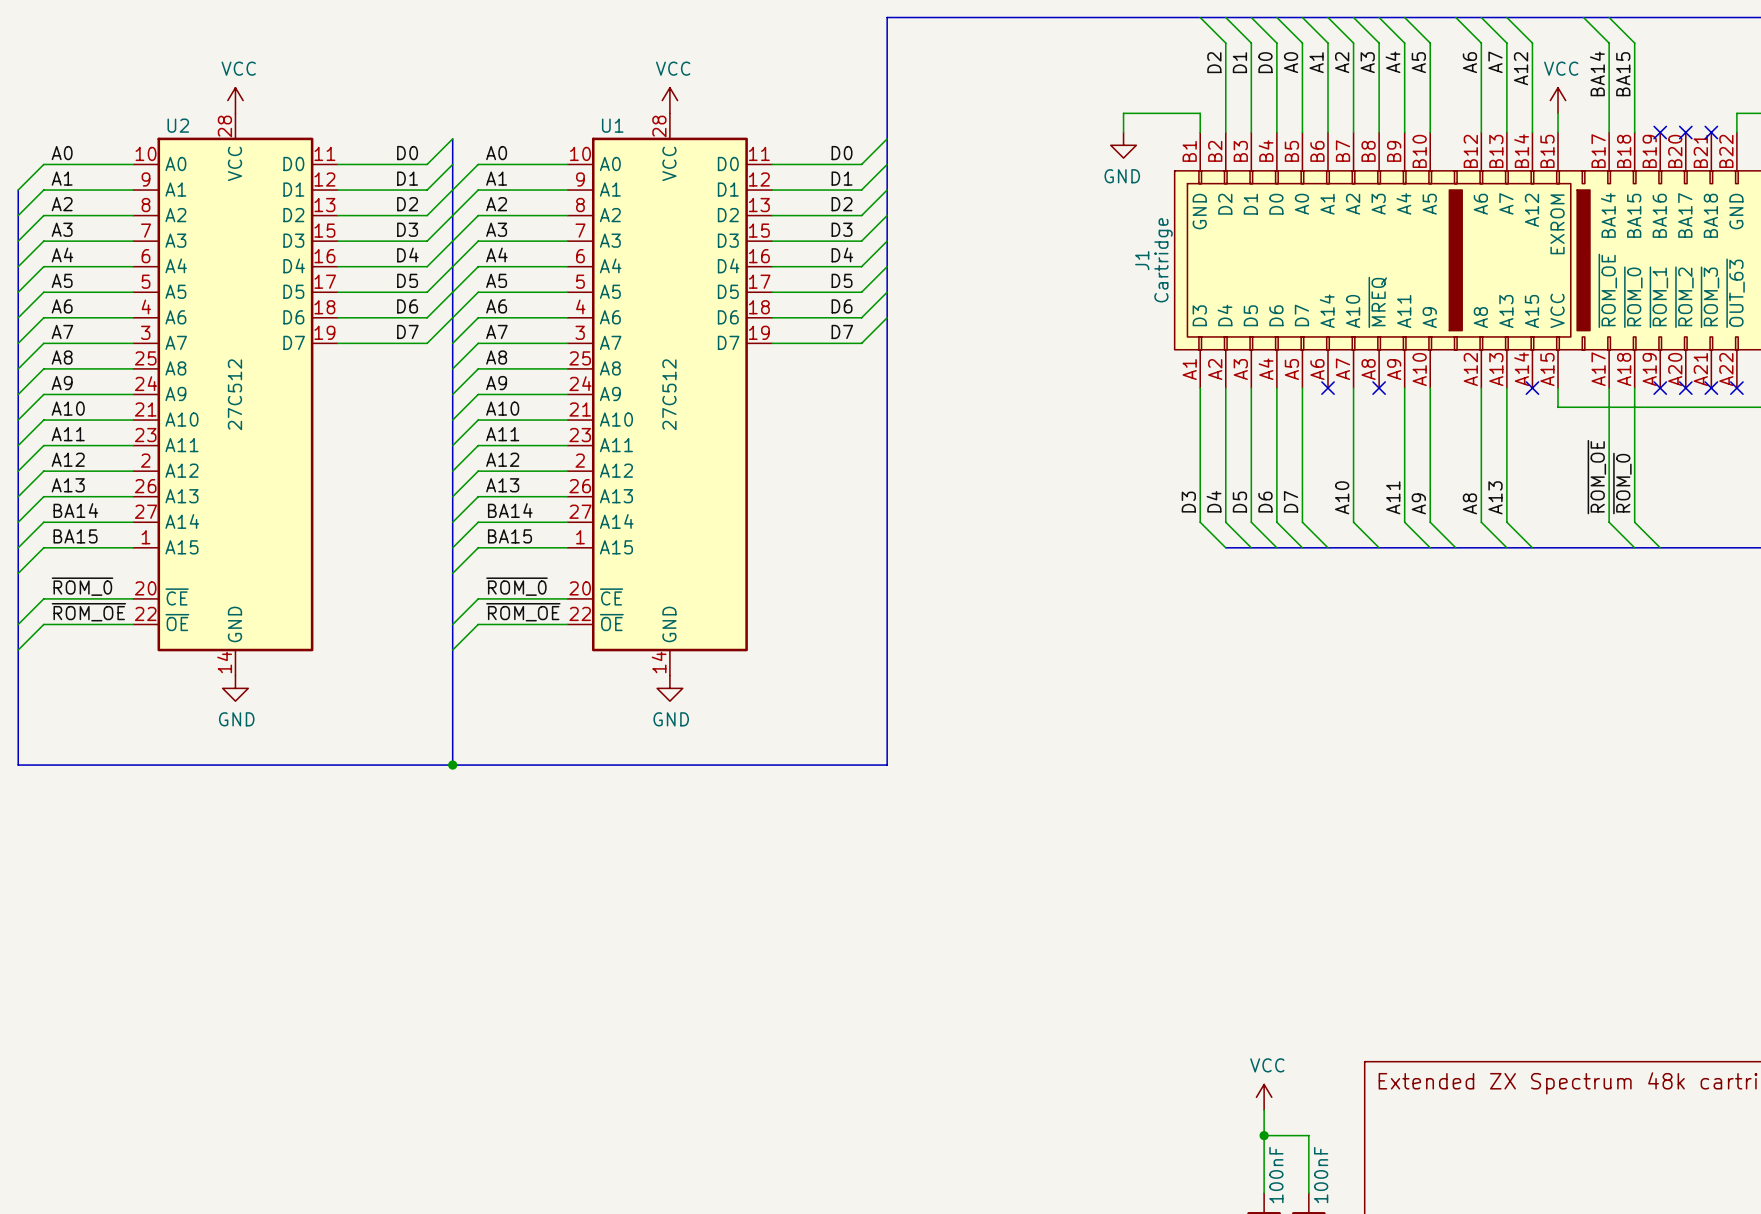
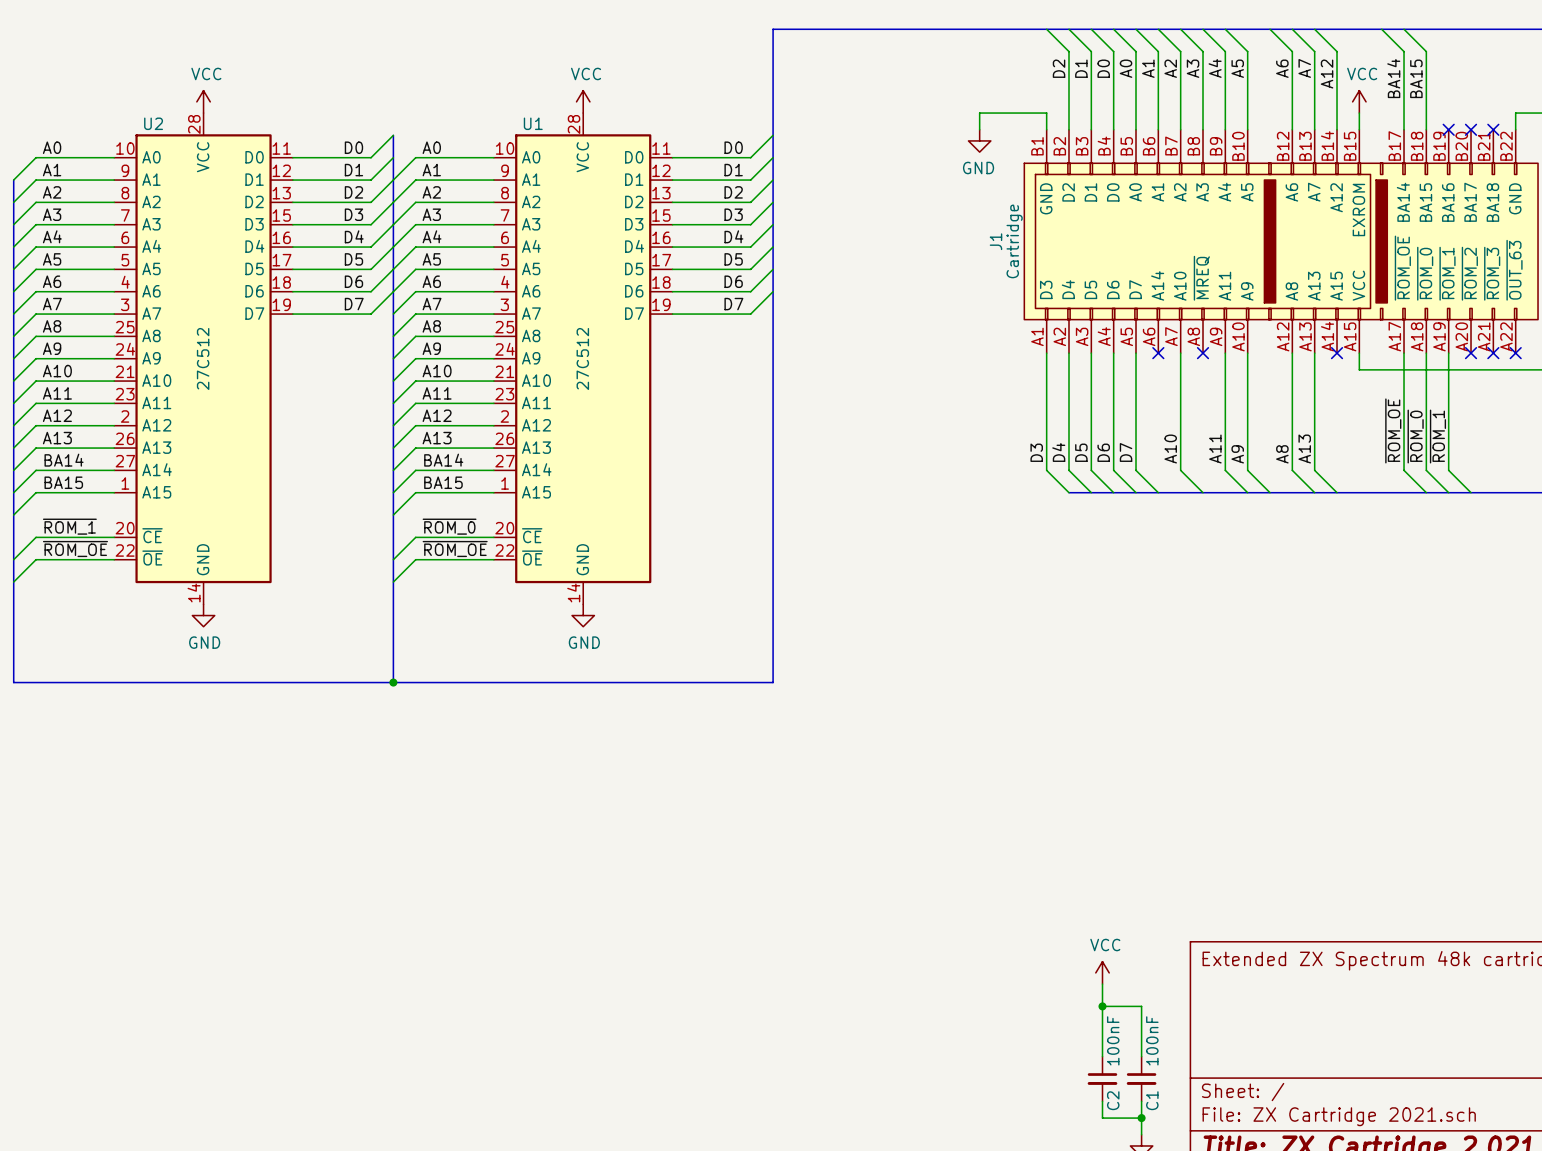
wire: none -> (1448, 353) (1448, 470) (1471, 492)
no-connect mark: (1660, 388) -> none
label: none -> ~{ROM_1} (1437, 436)
label: ~{ROM_0} (82, 586) -> ~{ROM_1} (69, 526)

